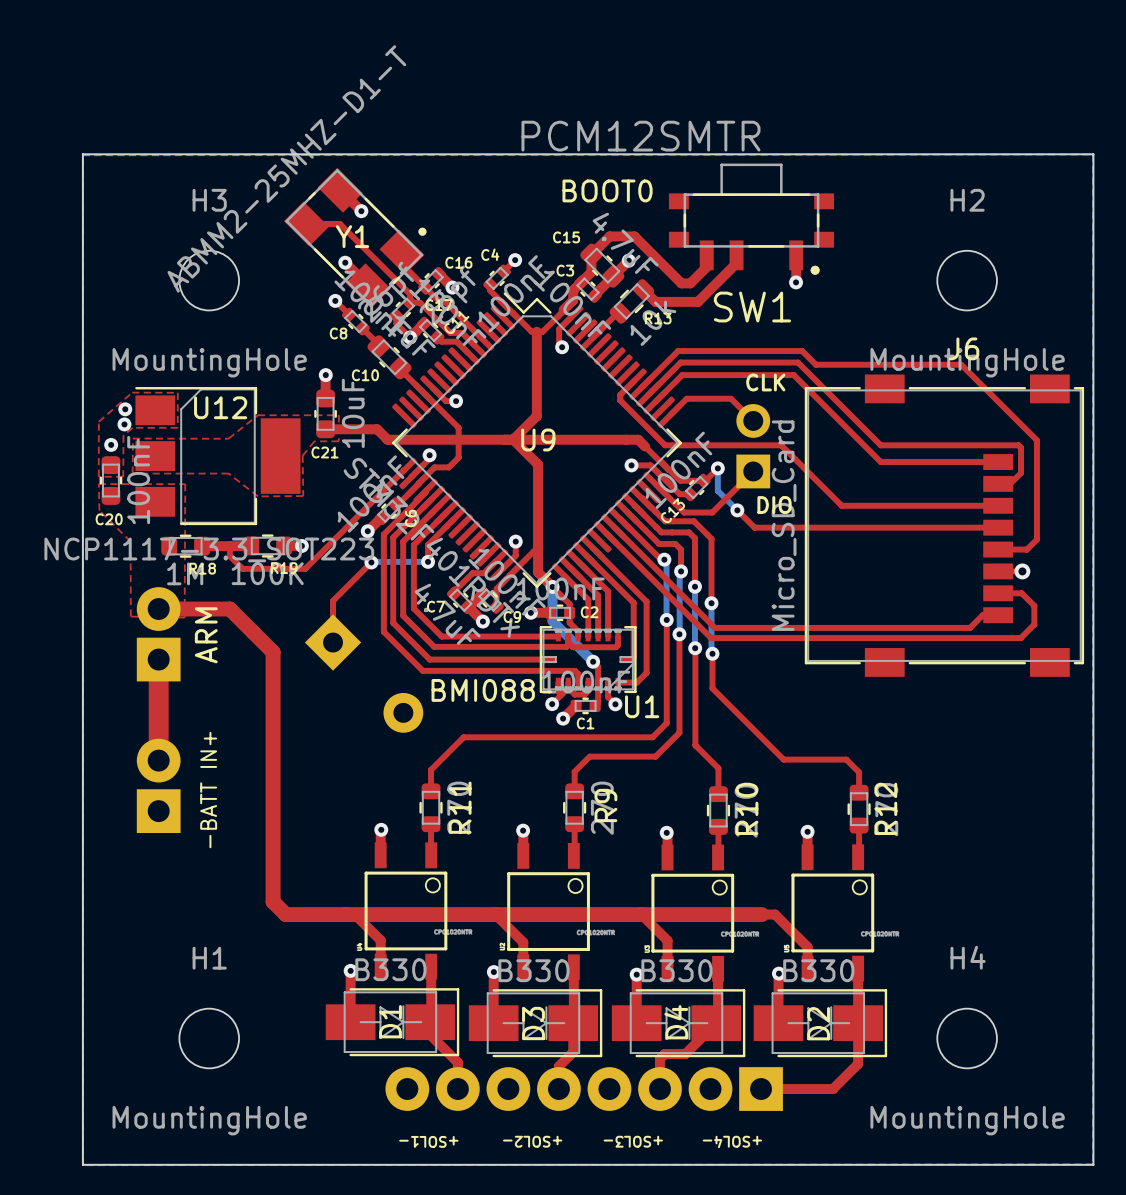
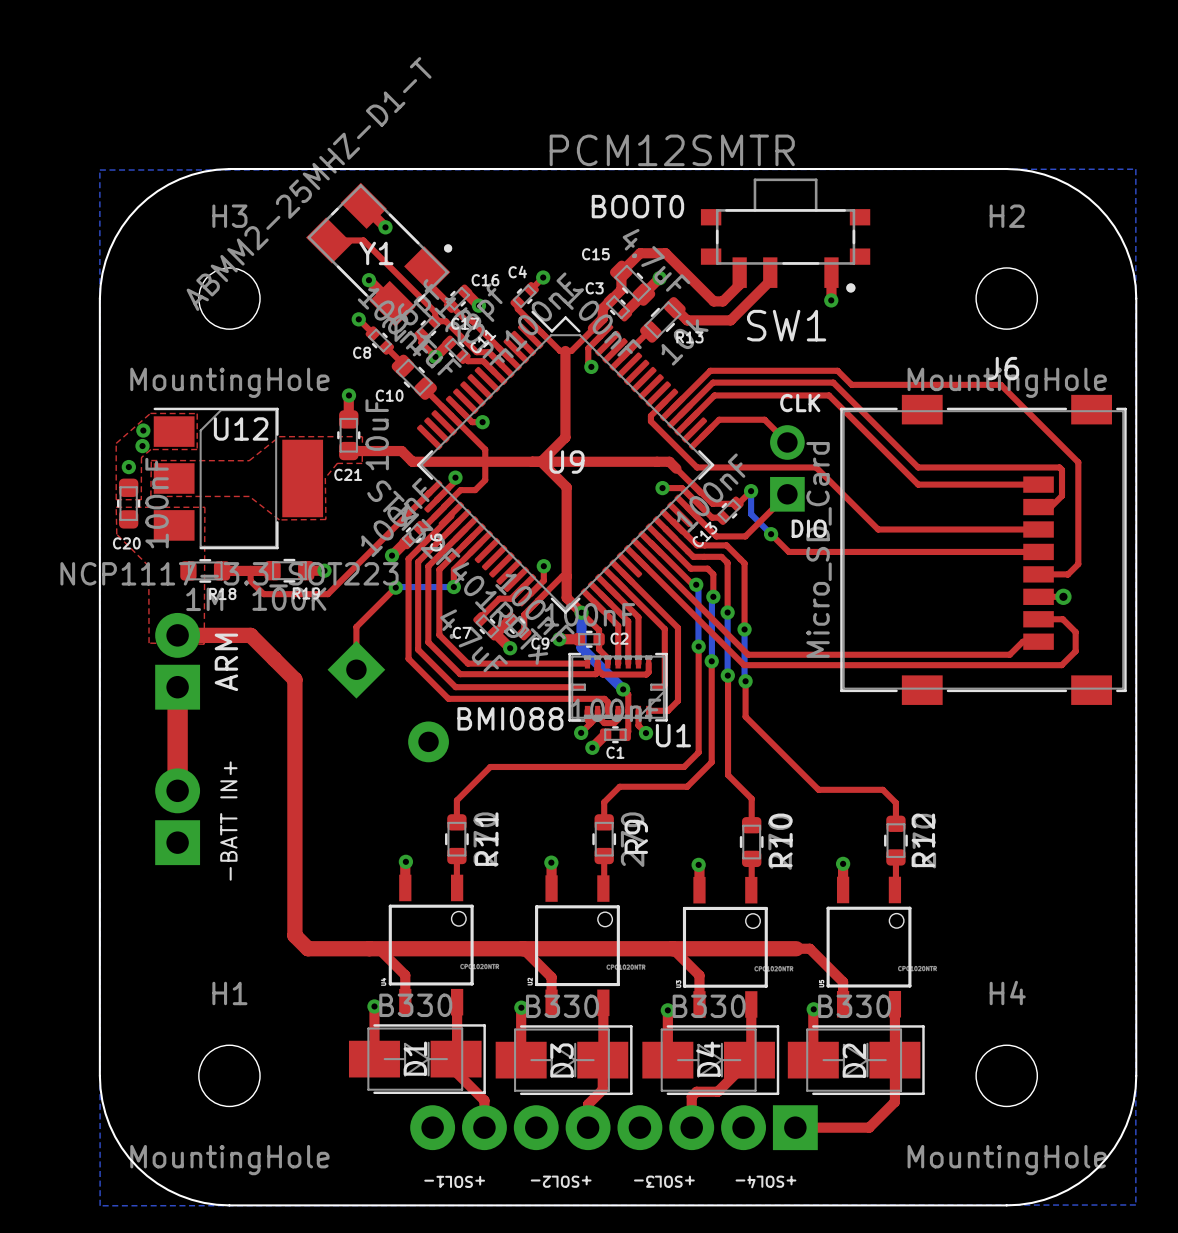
board edge: (209, 154) (82, 154) (82, 280) -> (229, 169) (204, 171) (180, 179) (157, 191) (138, 207) (122, 226) (110, 249) (102, 273) (99, 298)
board edge: (967, 154) (1093, 154) (1093, 280) -> (1006, 169) (1031, 171) (1056, 178) (1078, 190) (1098, 206) (1114, 226) (1126, 248) (1133, 273) (1136, 298)
board edge: (82, 1038) (82, 1164) (209, 1164) -> (99, 1075) (102, 1101) (109, 1125) (121, 1147) (137, 1167) (157, 1183) (179, 1195) (204, 1202) (229, 1205)
board edge: (1093, 1038) (1093, 1164) (967, 1164) -> (1136, 1075) (1133, 1101) (1126, 1125) (1114, 1147) (1098, 1167) (1078, 1183) (1056, 1195) (1031, 1202) (1006, 1205)

